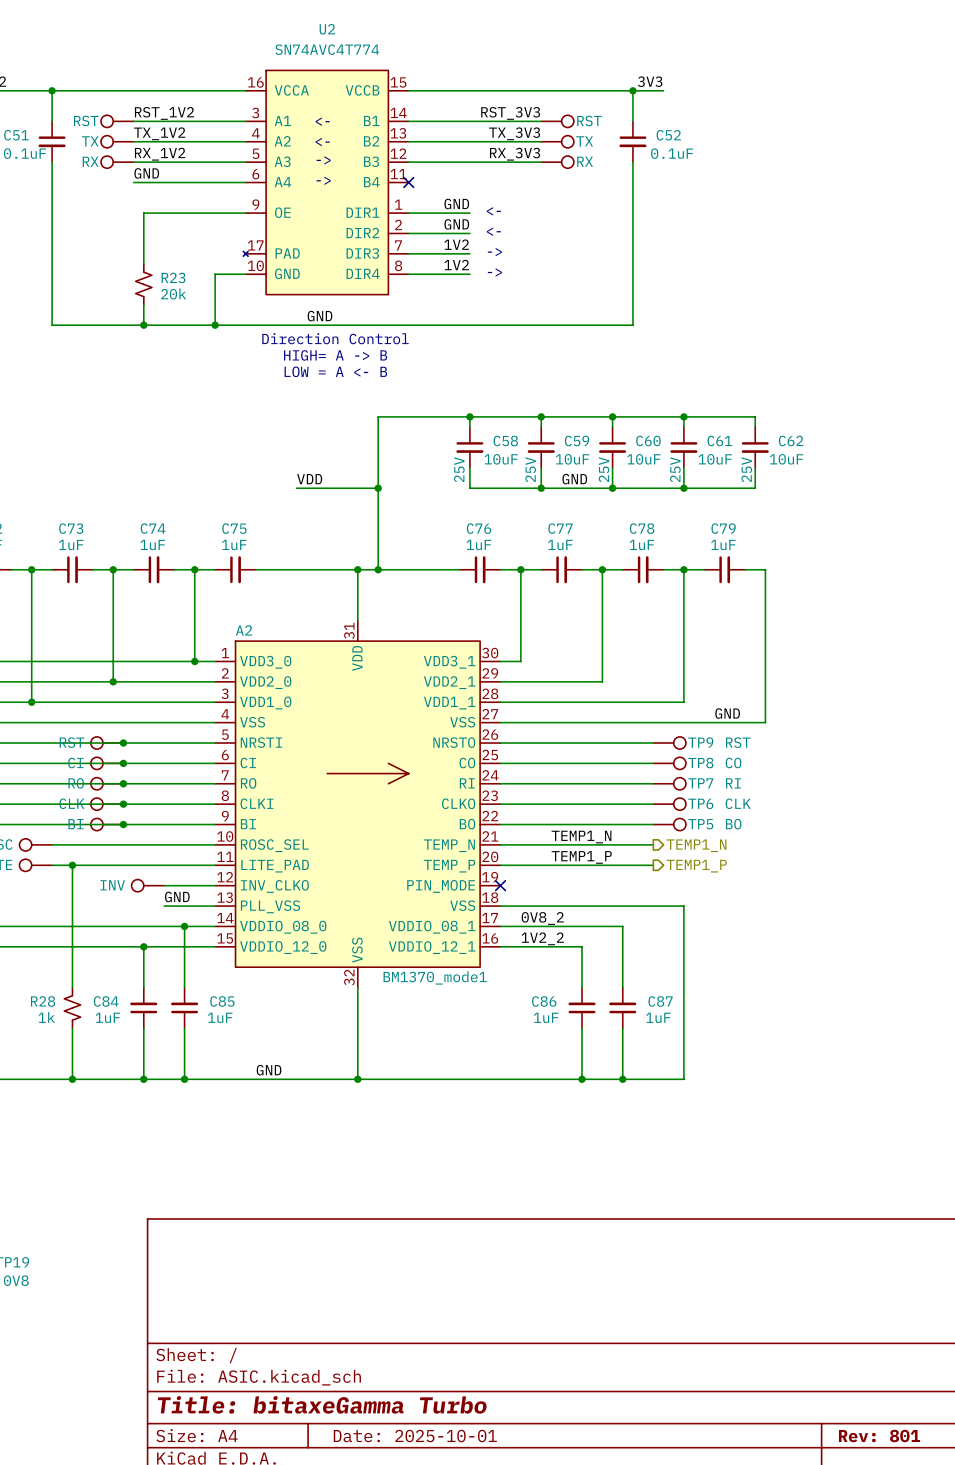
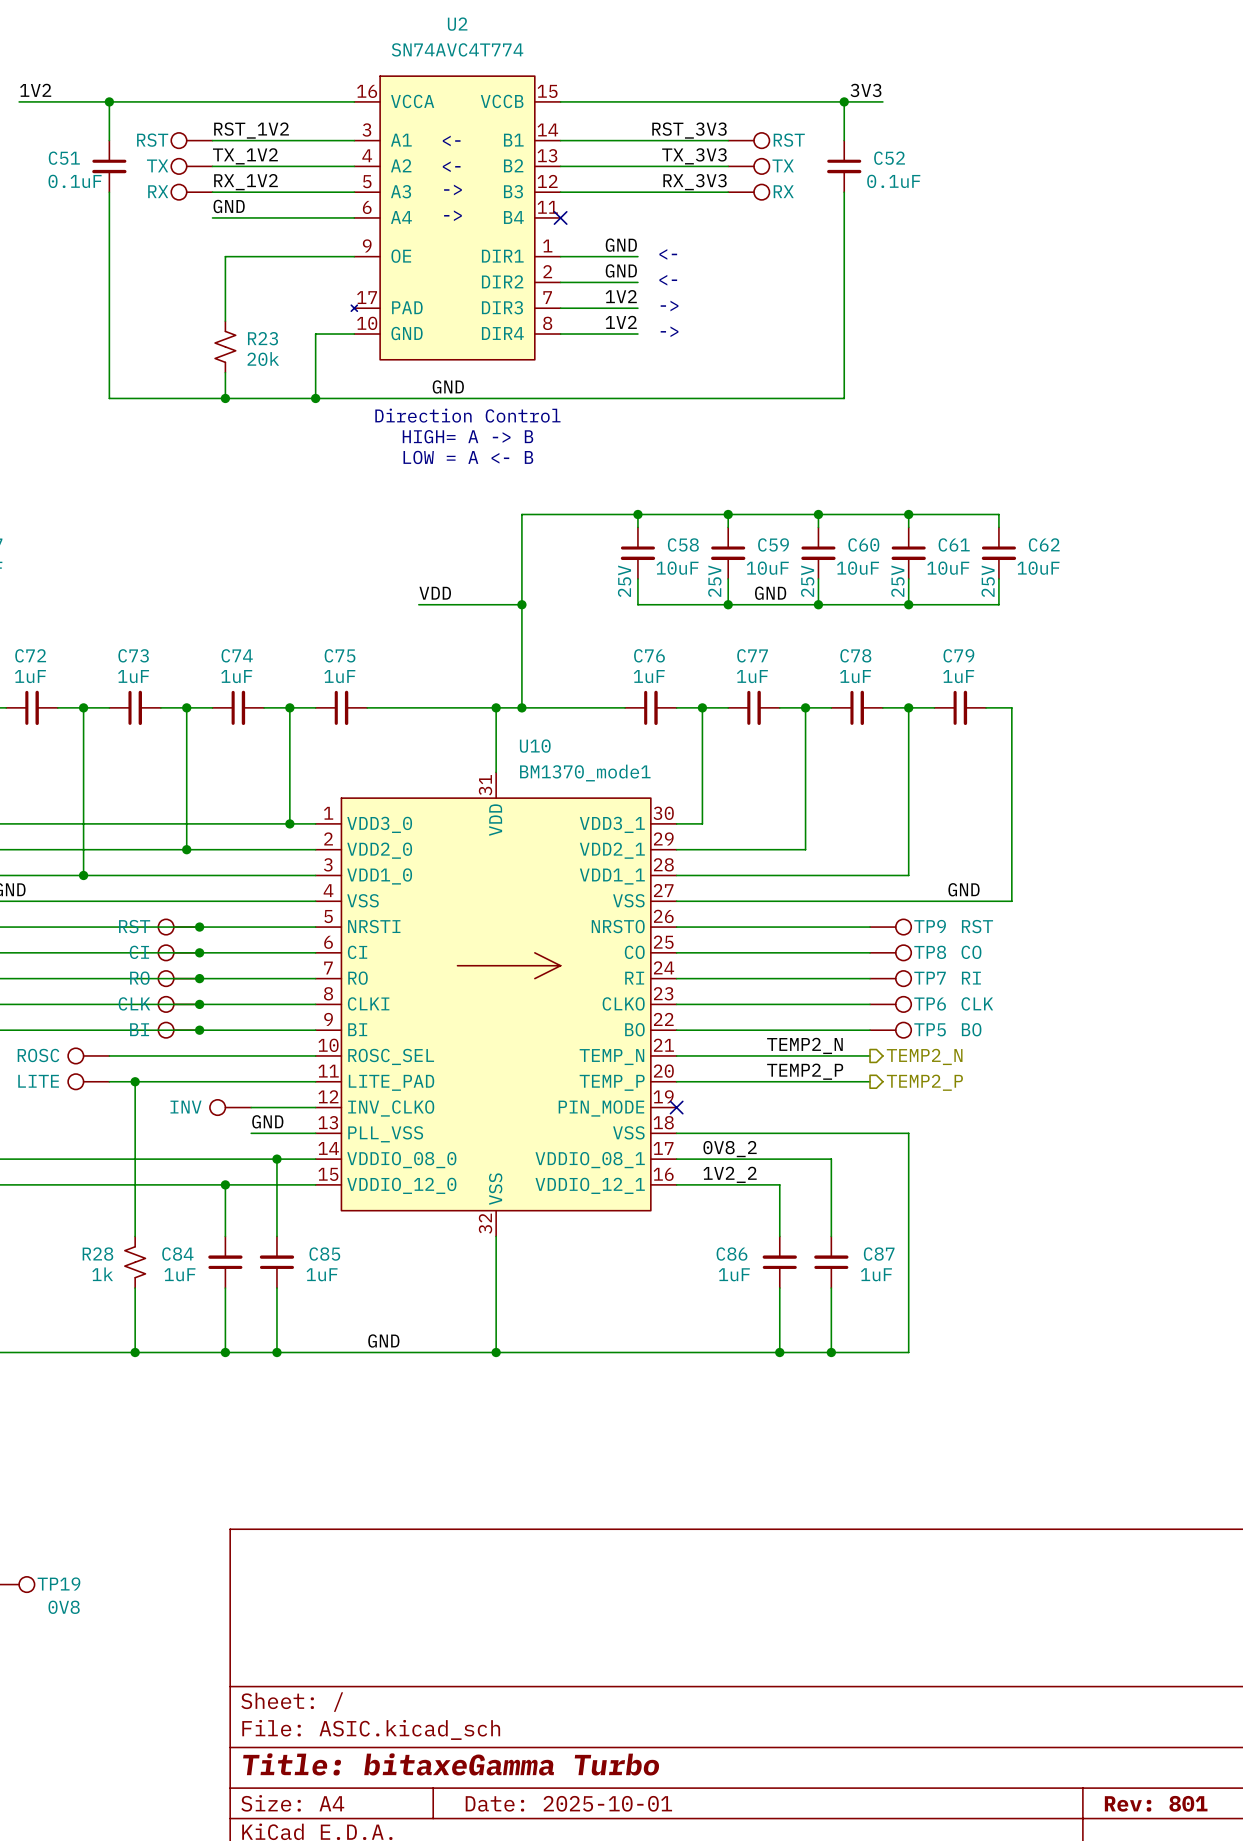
A2 name: A2 (244, 630) -> U10 (535, 746)
label: none -> TEMP2_N (804, 1045)
label: TEMP1_N (581, 837) -> none
hierarchical label: TEMP1_N (696, 845) -> TEMP2_N (924, 1056)
label: TEMP1_P (581, 857) -> none
label: none -> TEMP2_P (805, 1071)
hierarchical label: TEMP1_P (696, 866) -> TEMP2_P (924, 1082)
A2 value position: BM1370_mode1 (435, 977) -> BM1370_mode1 (585, 773)

